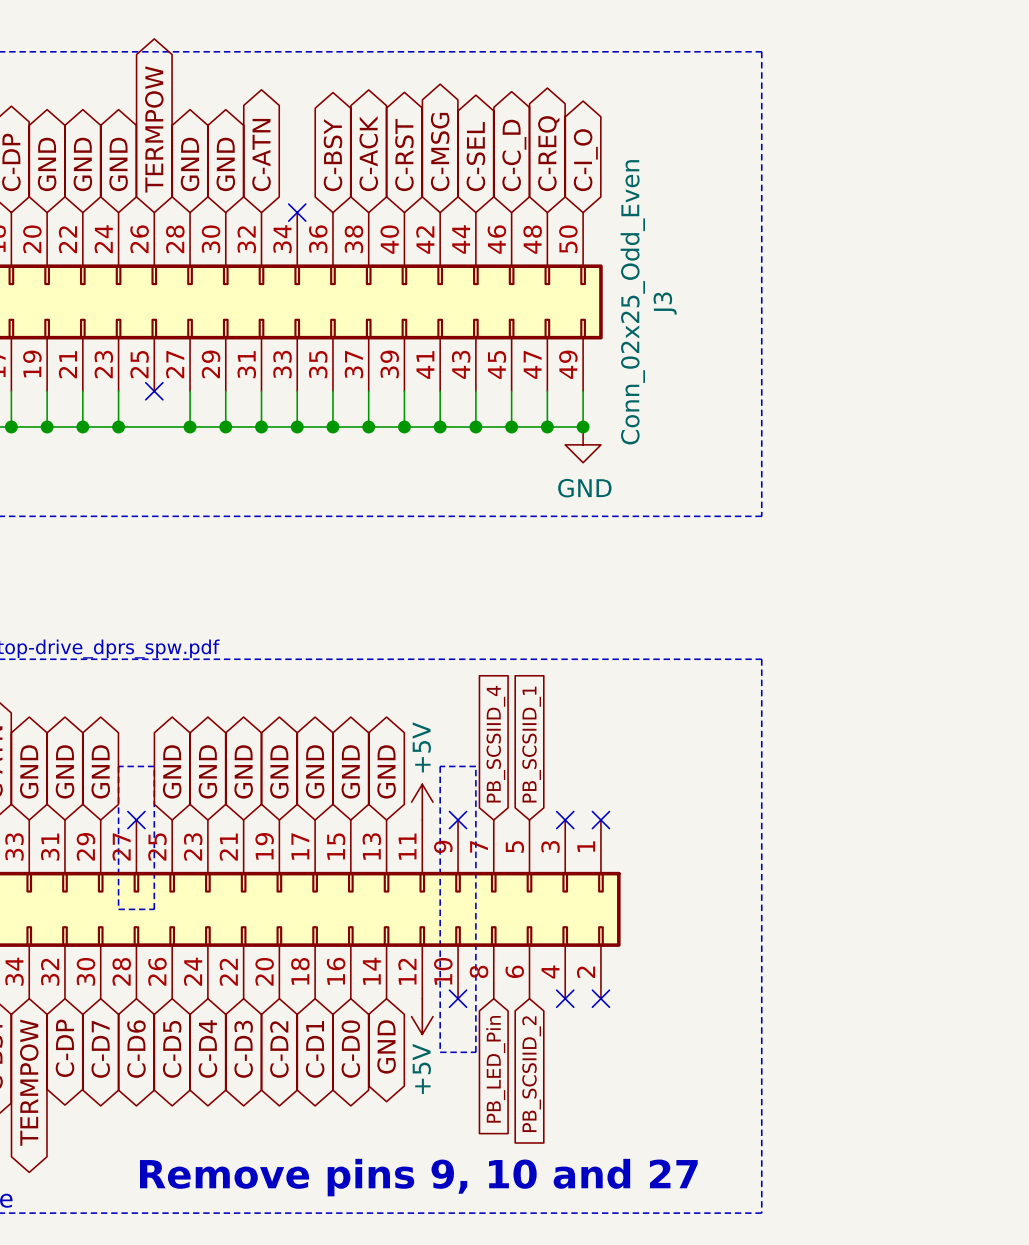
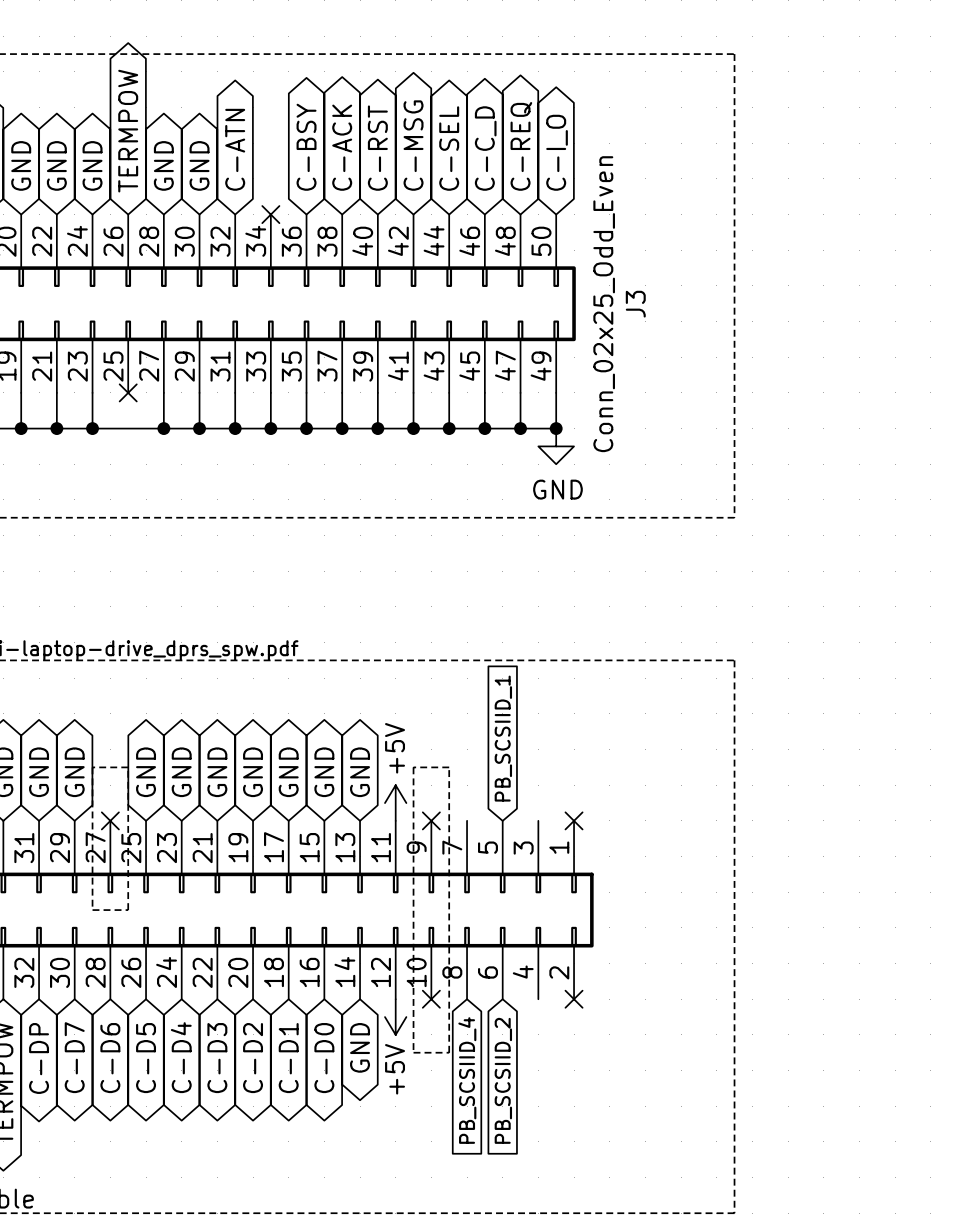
global label: PB_SCSIID_4 (495, 744) -> none
no-connect mark: (565, 820) -> none
no-connect mark: (565, 998) -> none
global label: PB_LED_Pin (495, 1069) -> PB_SCSIID_4 (467, 1080)
text: Remove pins 9, 10 and 27 (418, 1177) -> none

